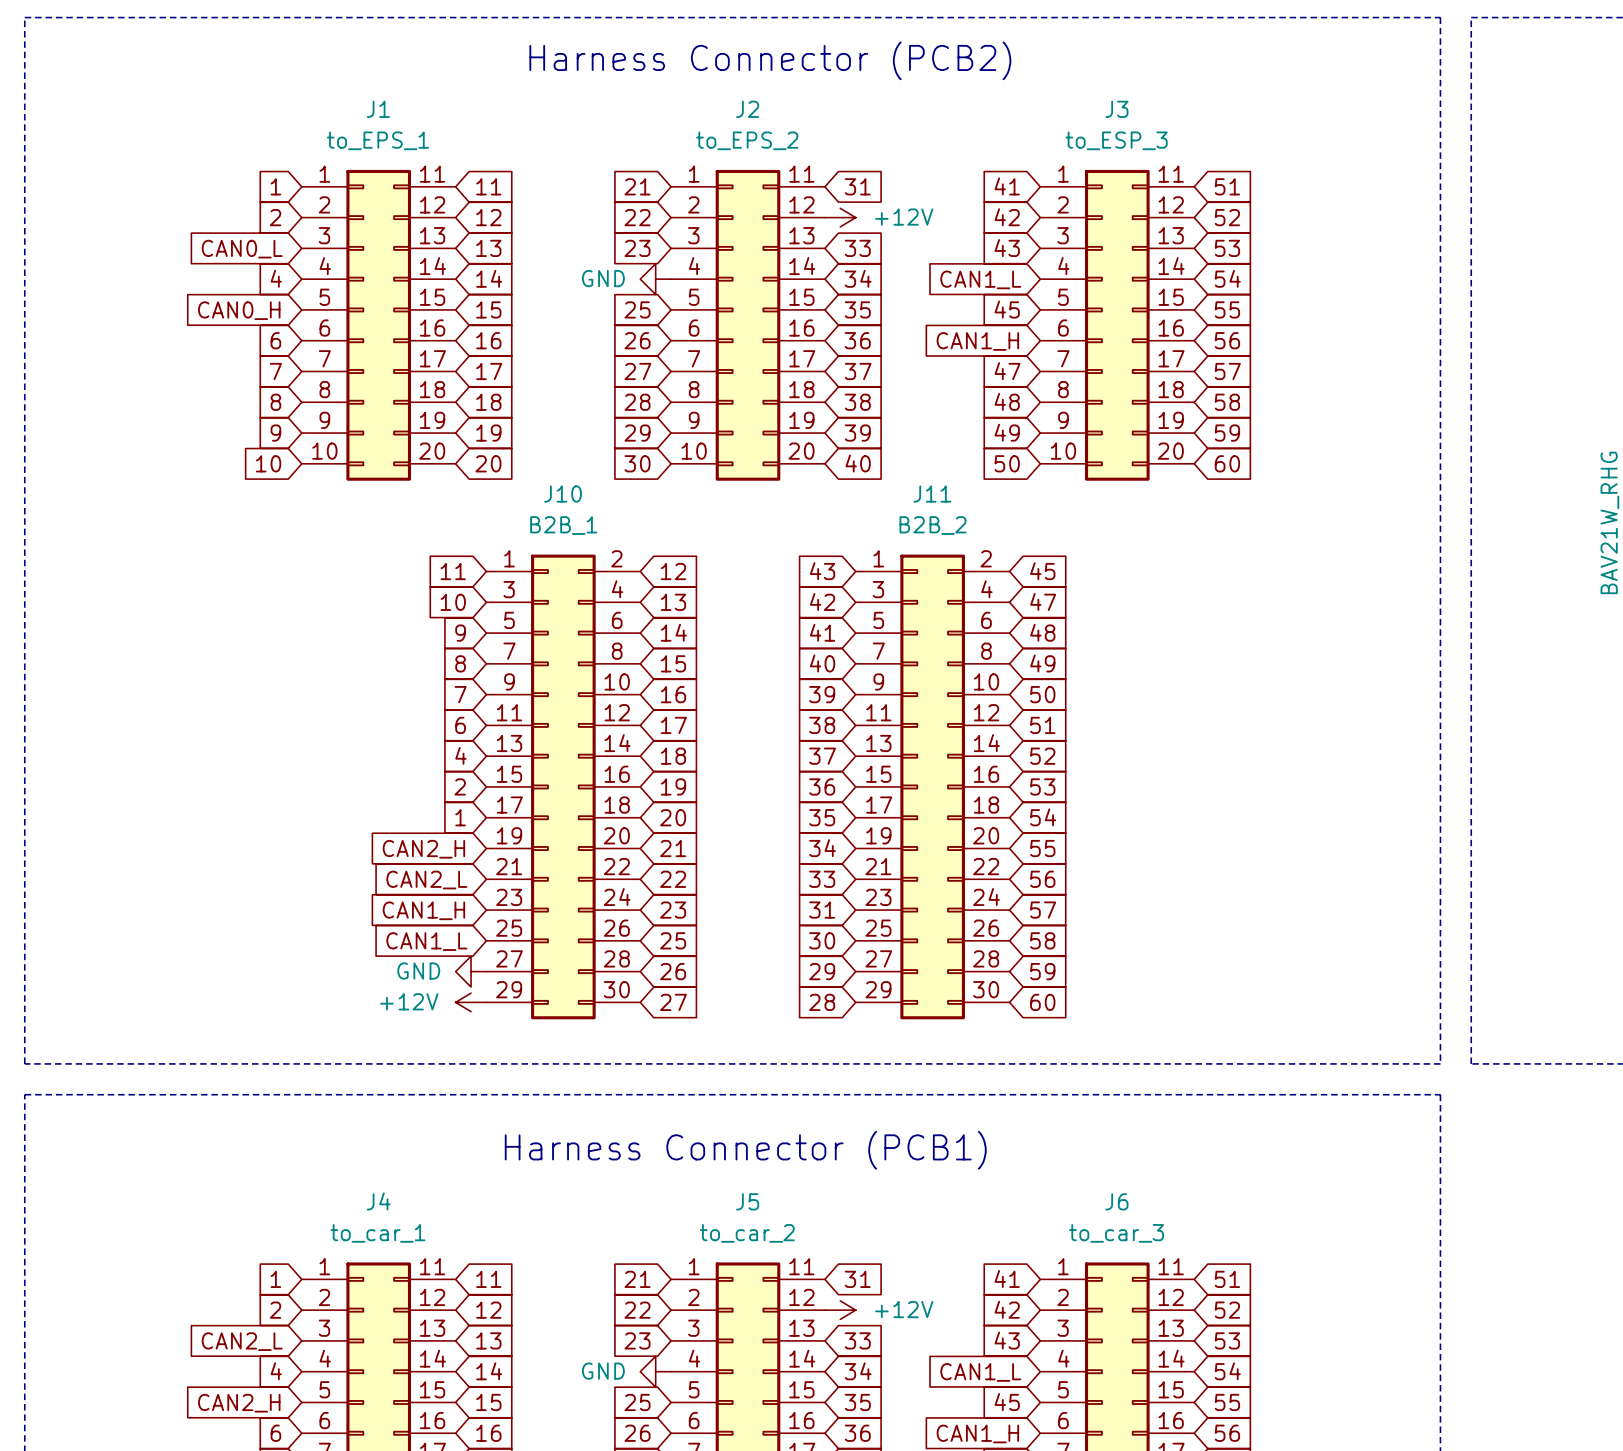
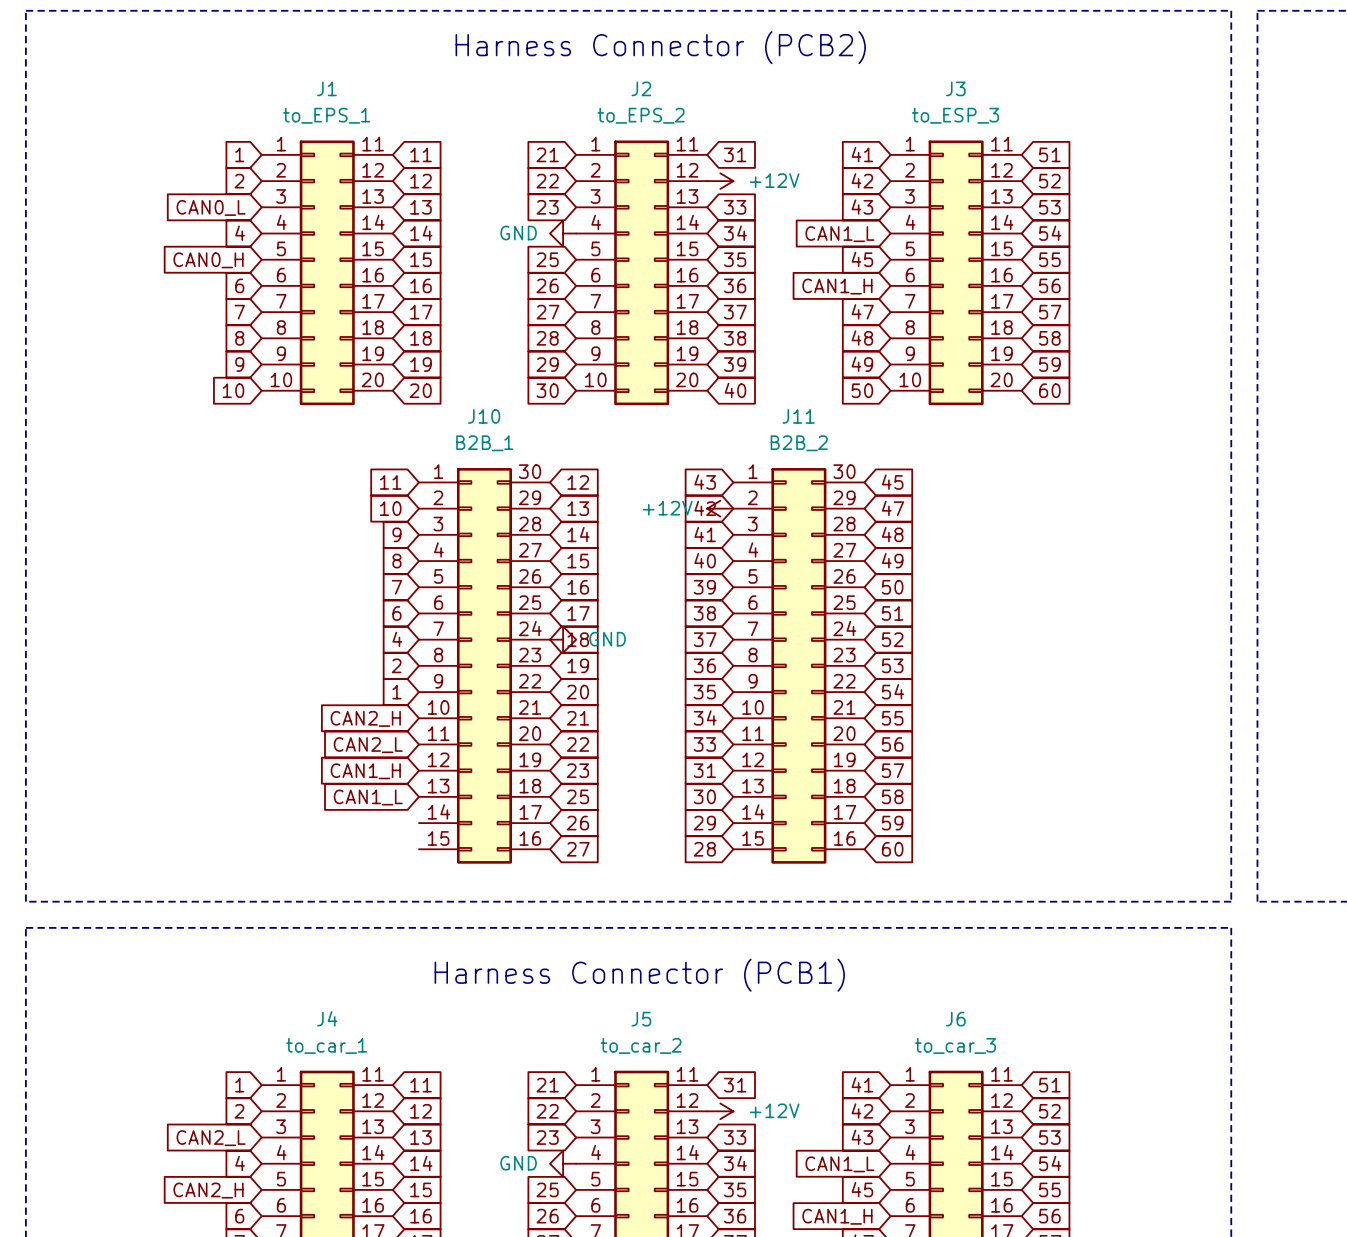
J10 symbol: [486, 554, 641, 1020] -> [418, 468, 550, 864]
J11 symbol: [855, 554, 1010, 1020] -> [733, 468, 865, 864]
power symbol: none -> +12V (720, 508)
power symbol rotation: 0° (471, 971) -> 180° (563, 639)
power symbol position: GND (471, 971) -> GND (563, 639)
power symbol: +12V (471, 1002) -> none

